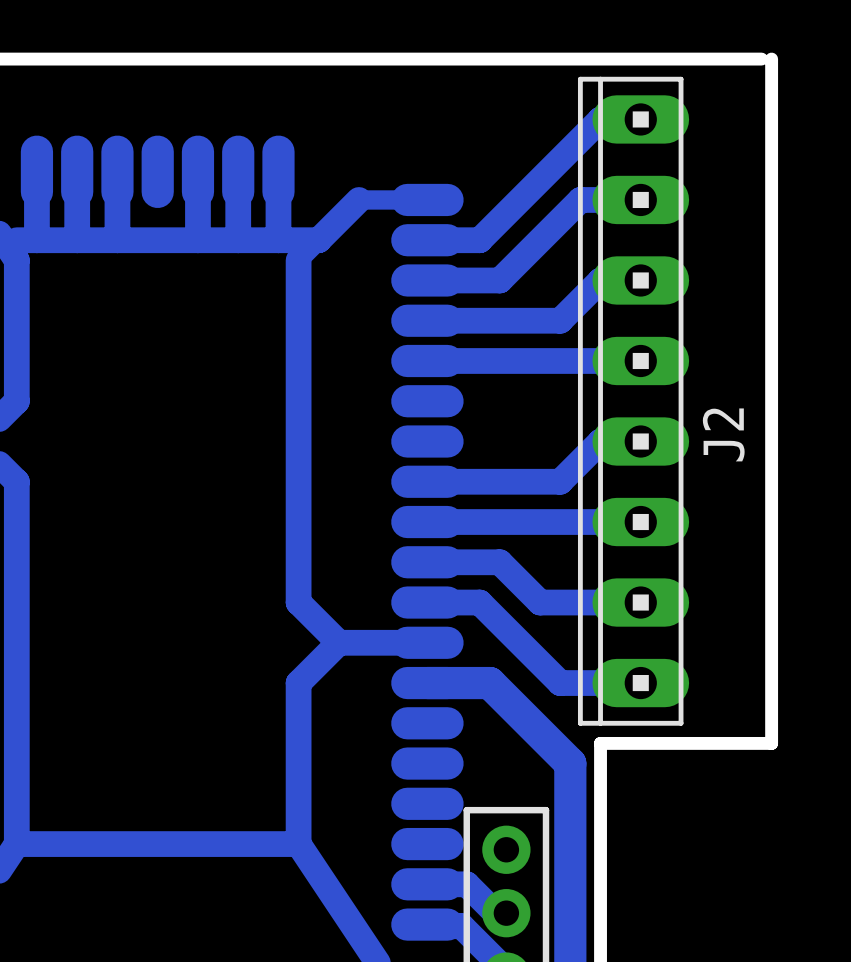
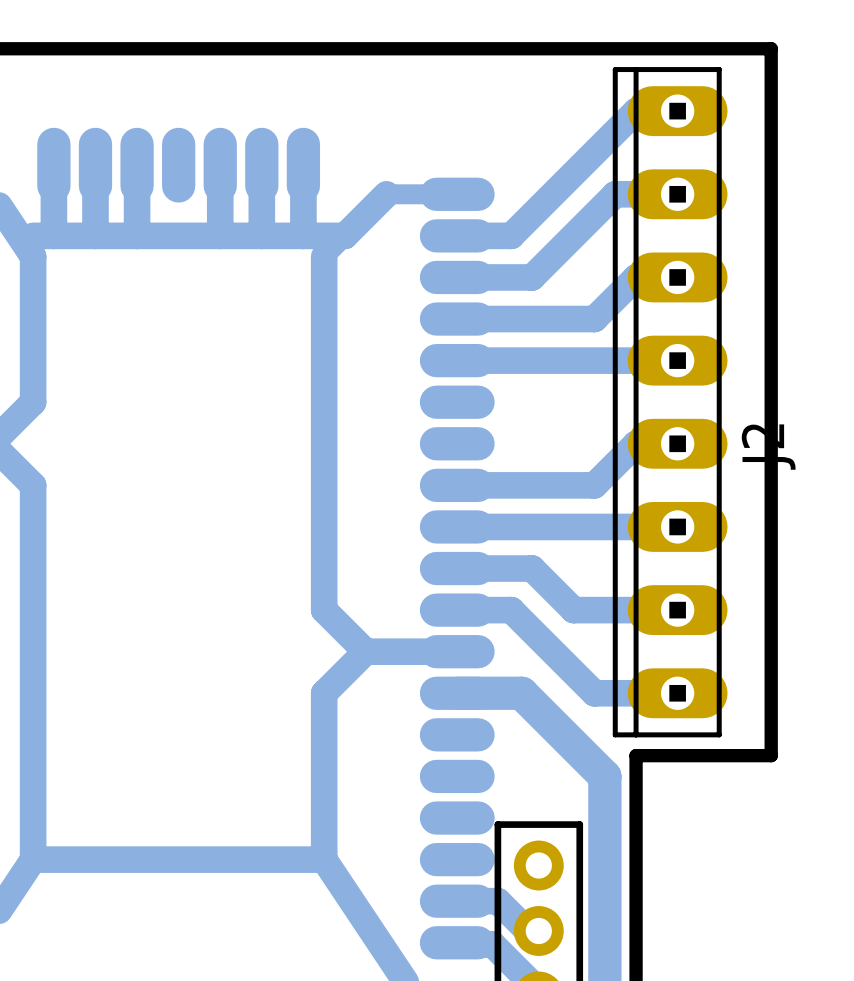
board edge: (731, 59) (761, 59) -> none
board edge: (771, 59) (771, 743) (731, 743) -> (771, 48) (771, 755)

